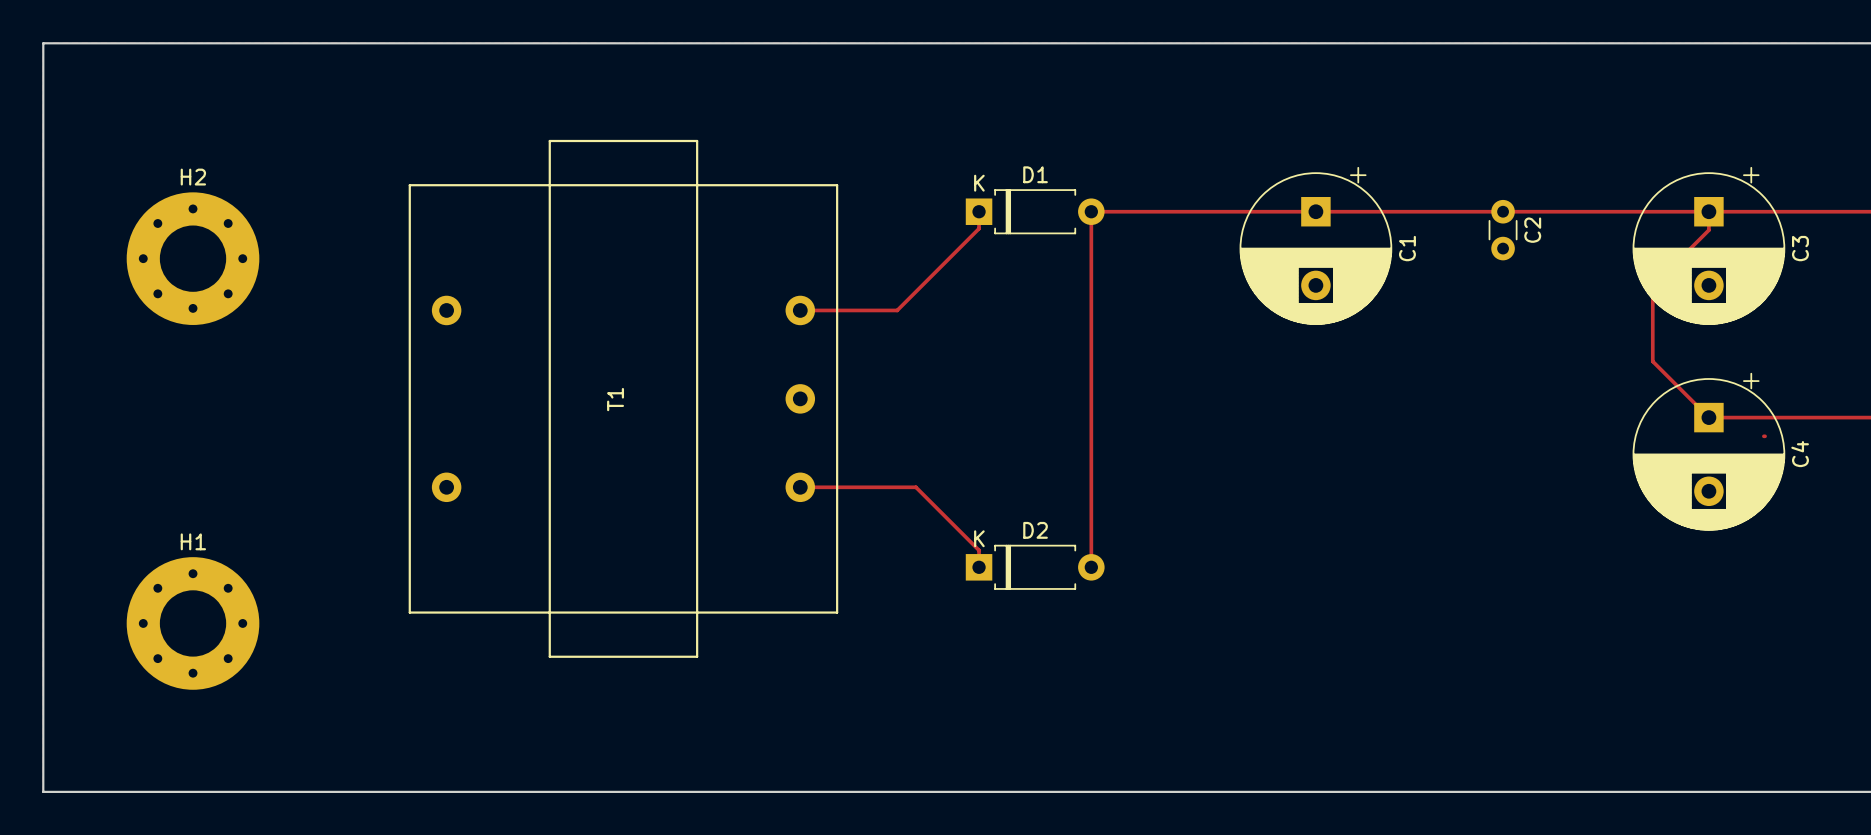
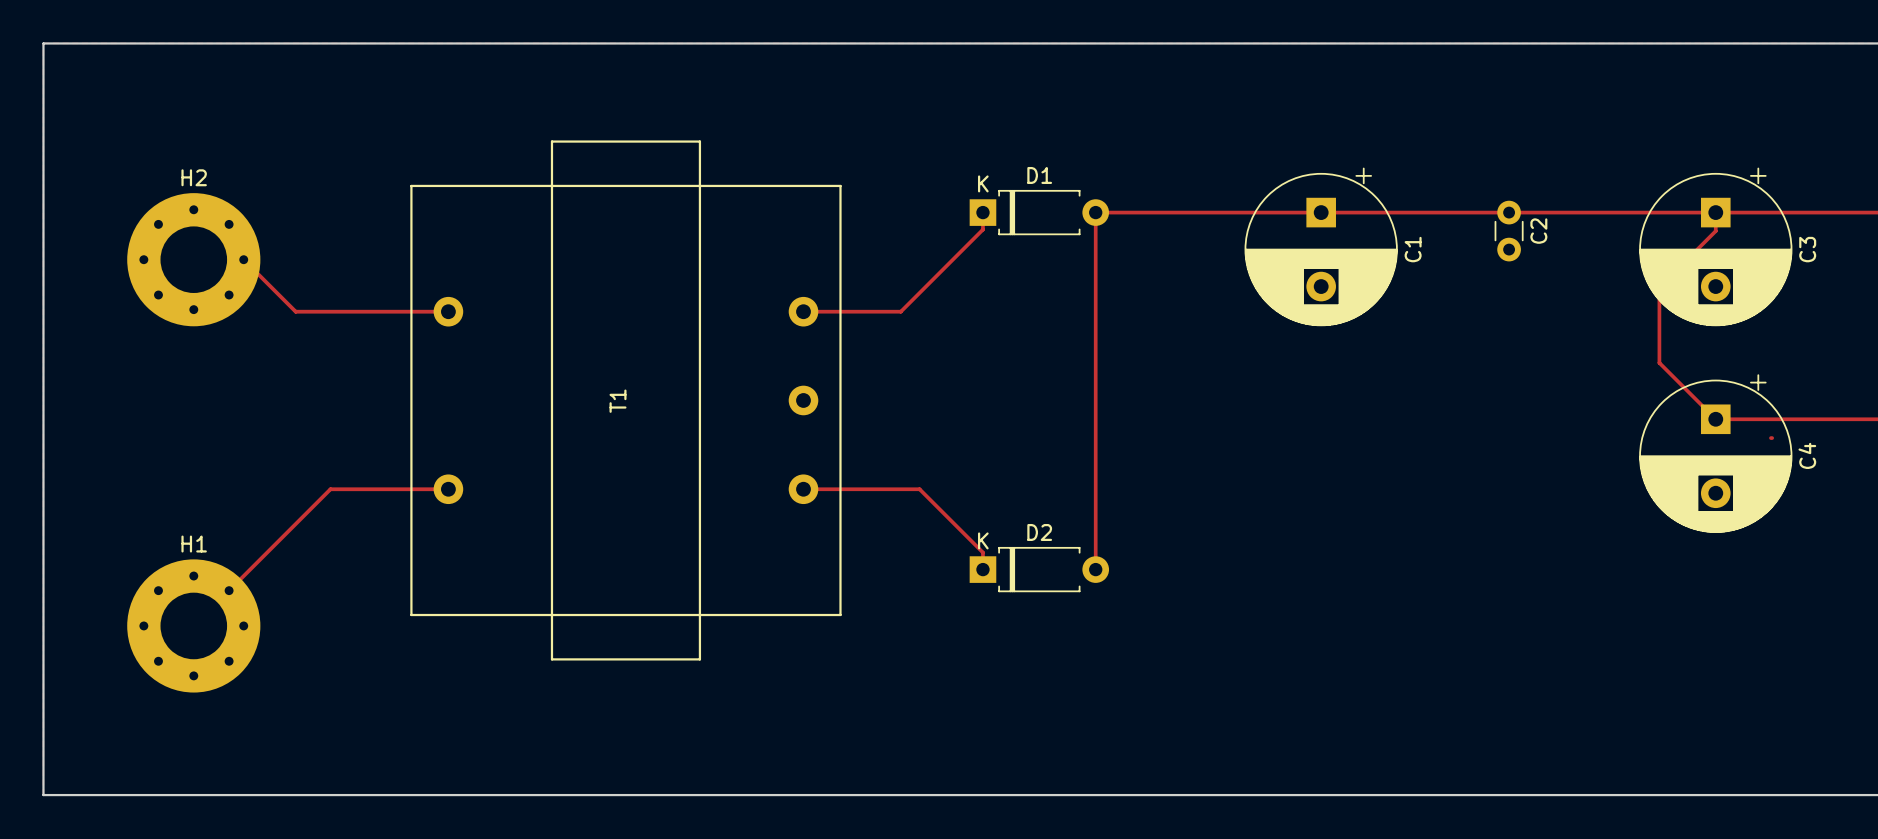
track: none -> (243, 259) (295, 311) (448, 311)
track: none -> (448, 489) (330, 489) (229, 590)

